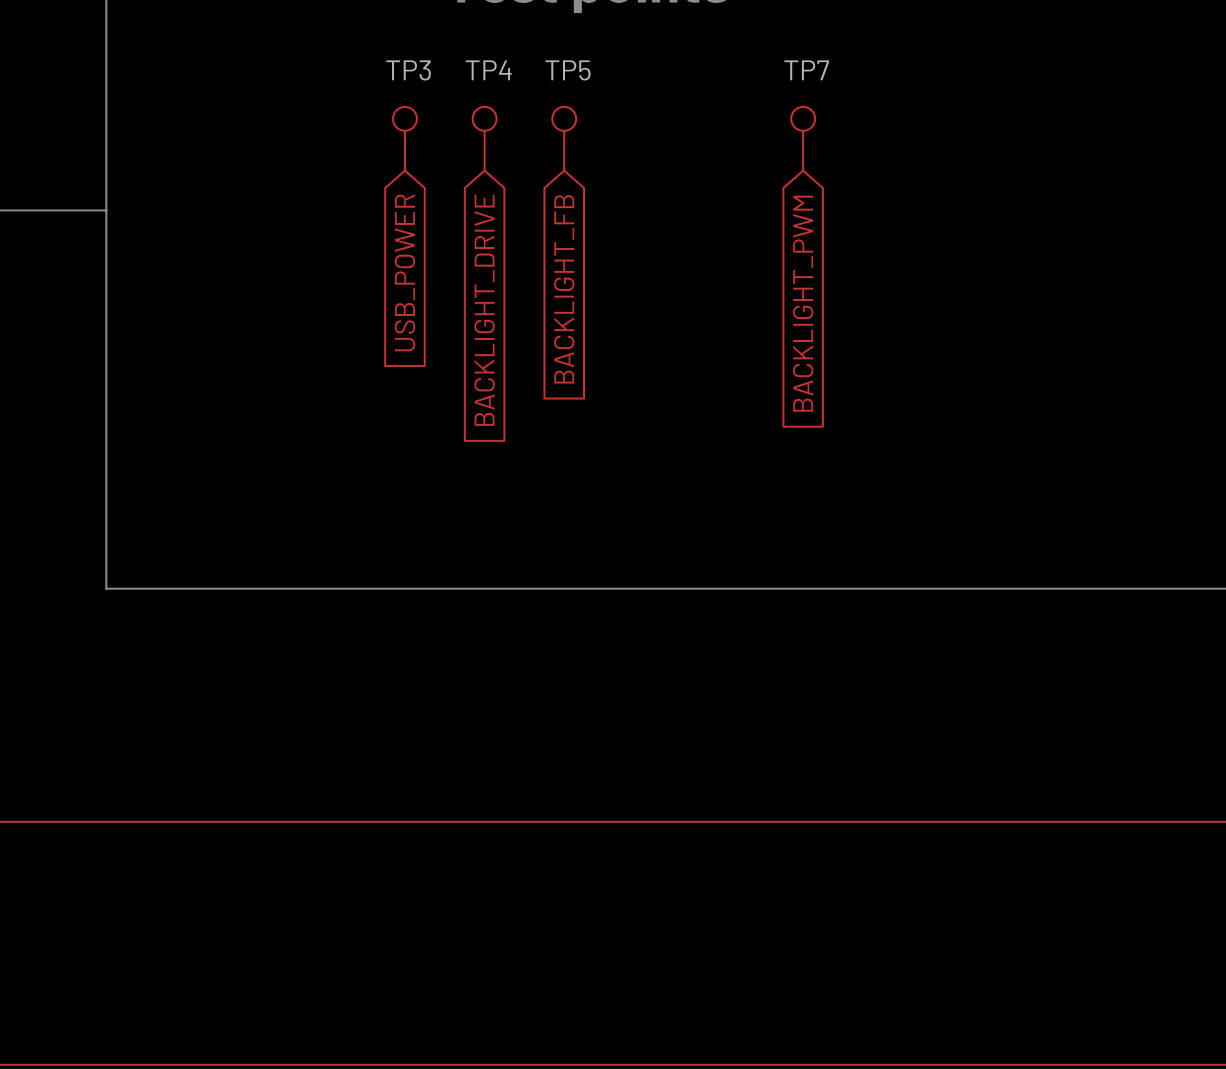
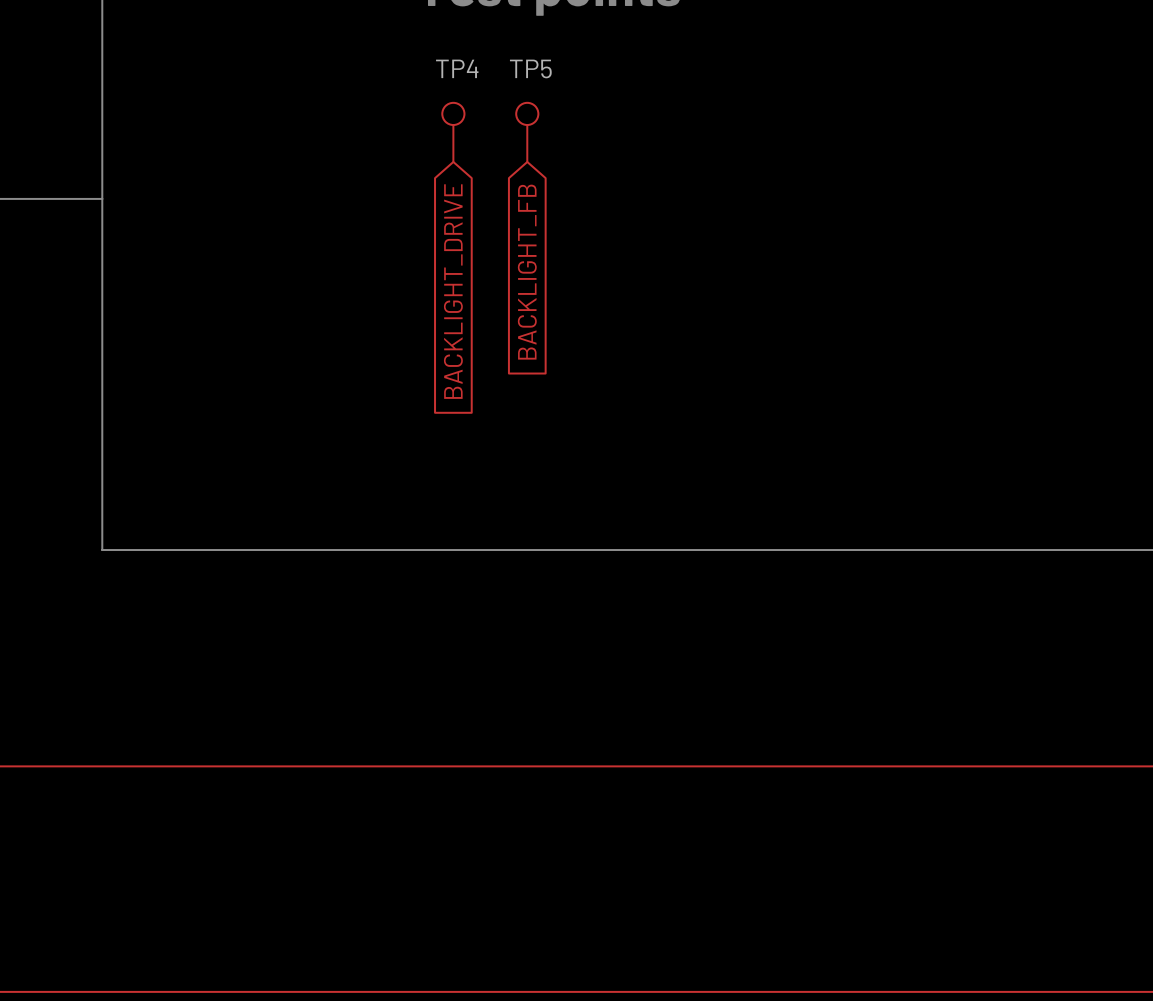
TP3: (404, 138) -> none
TP7: (803, 138) -> none
global label: USB_POWER (404, 272) -> none
global label: BACKLIGHT_PWM (803, 303) -> none

